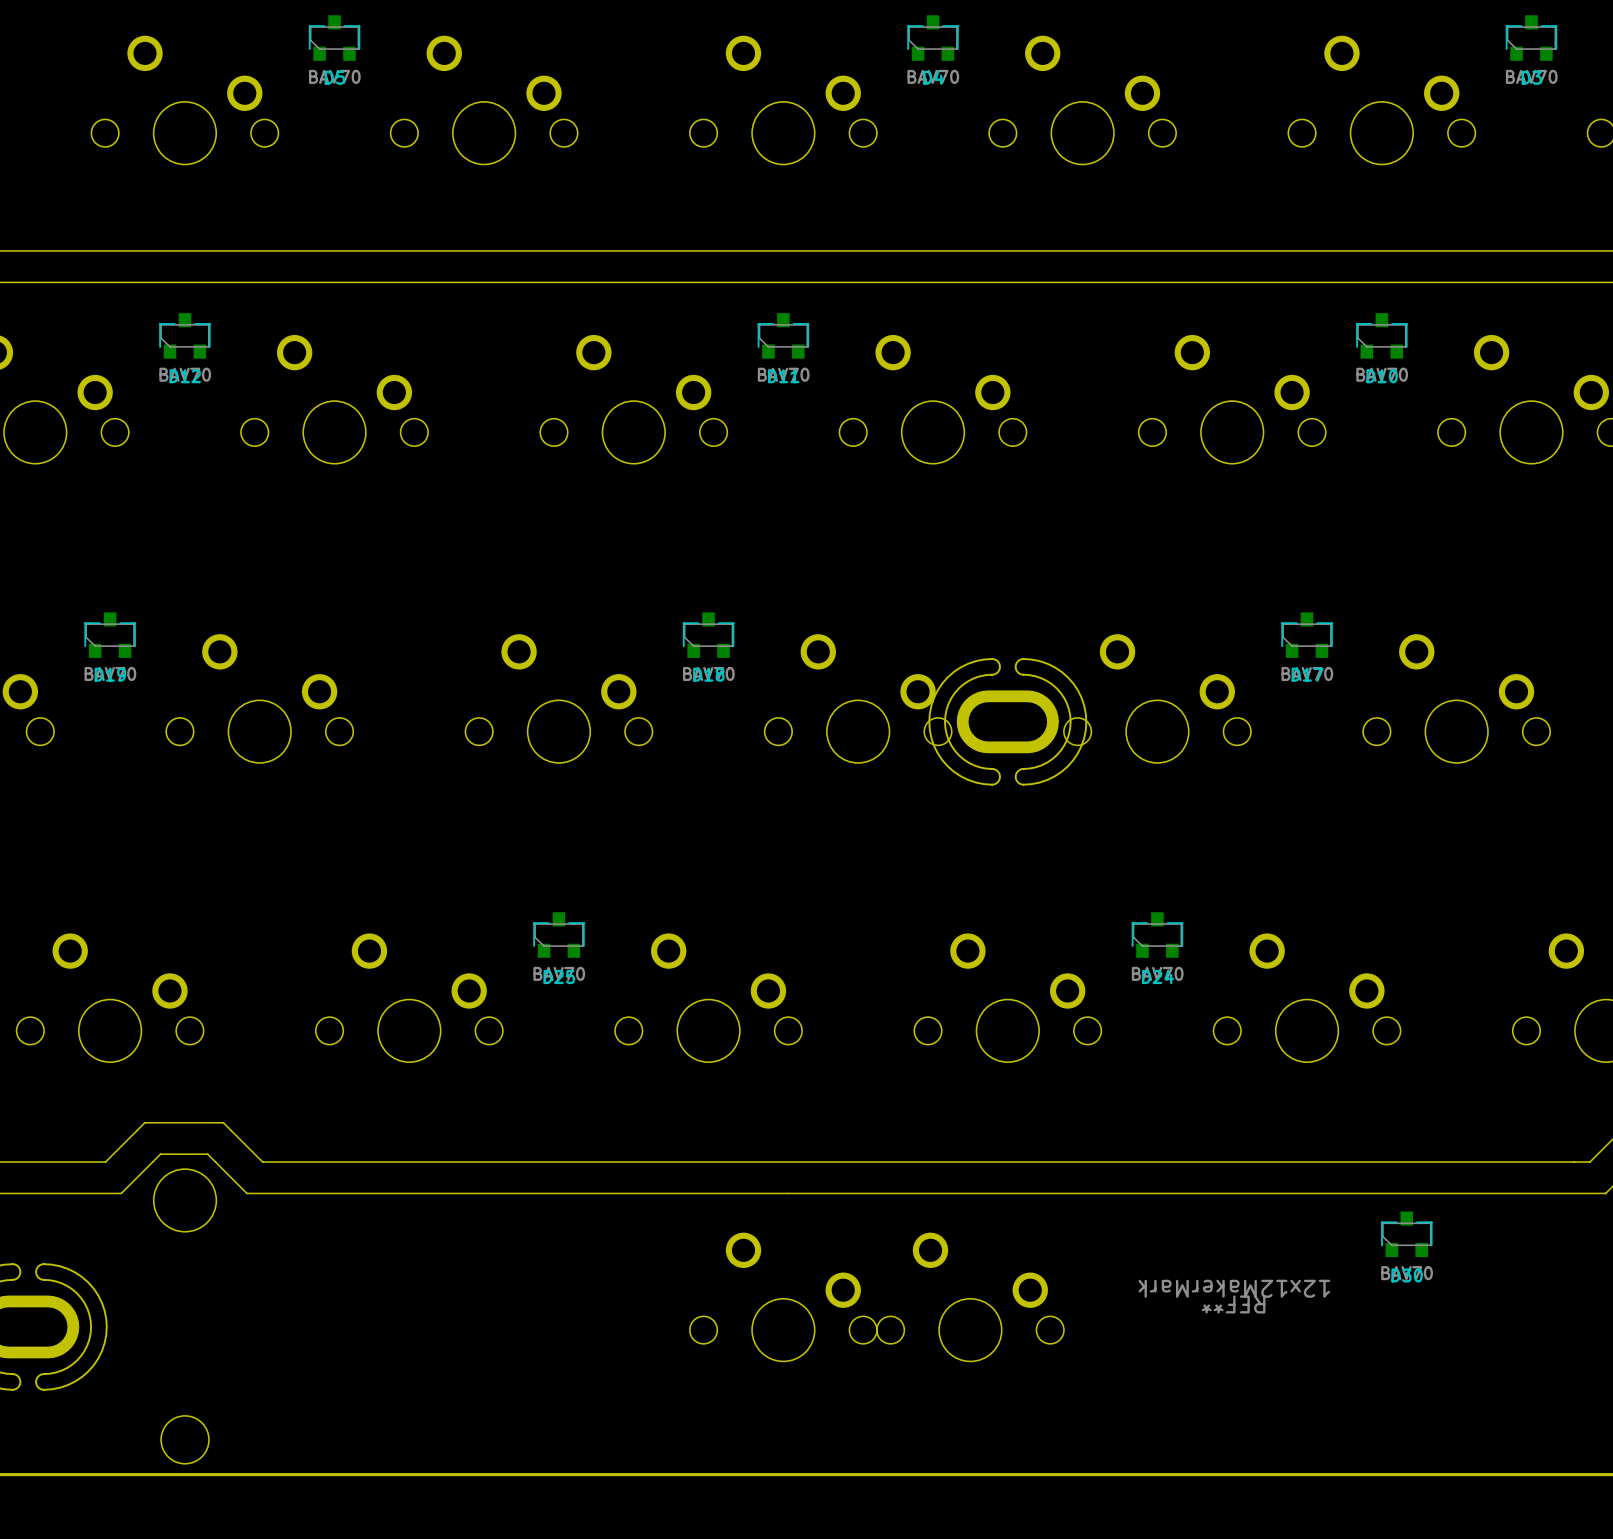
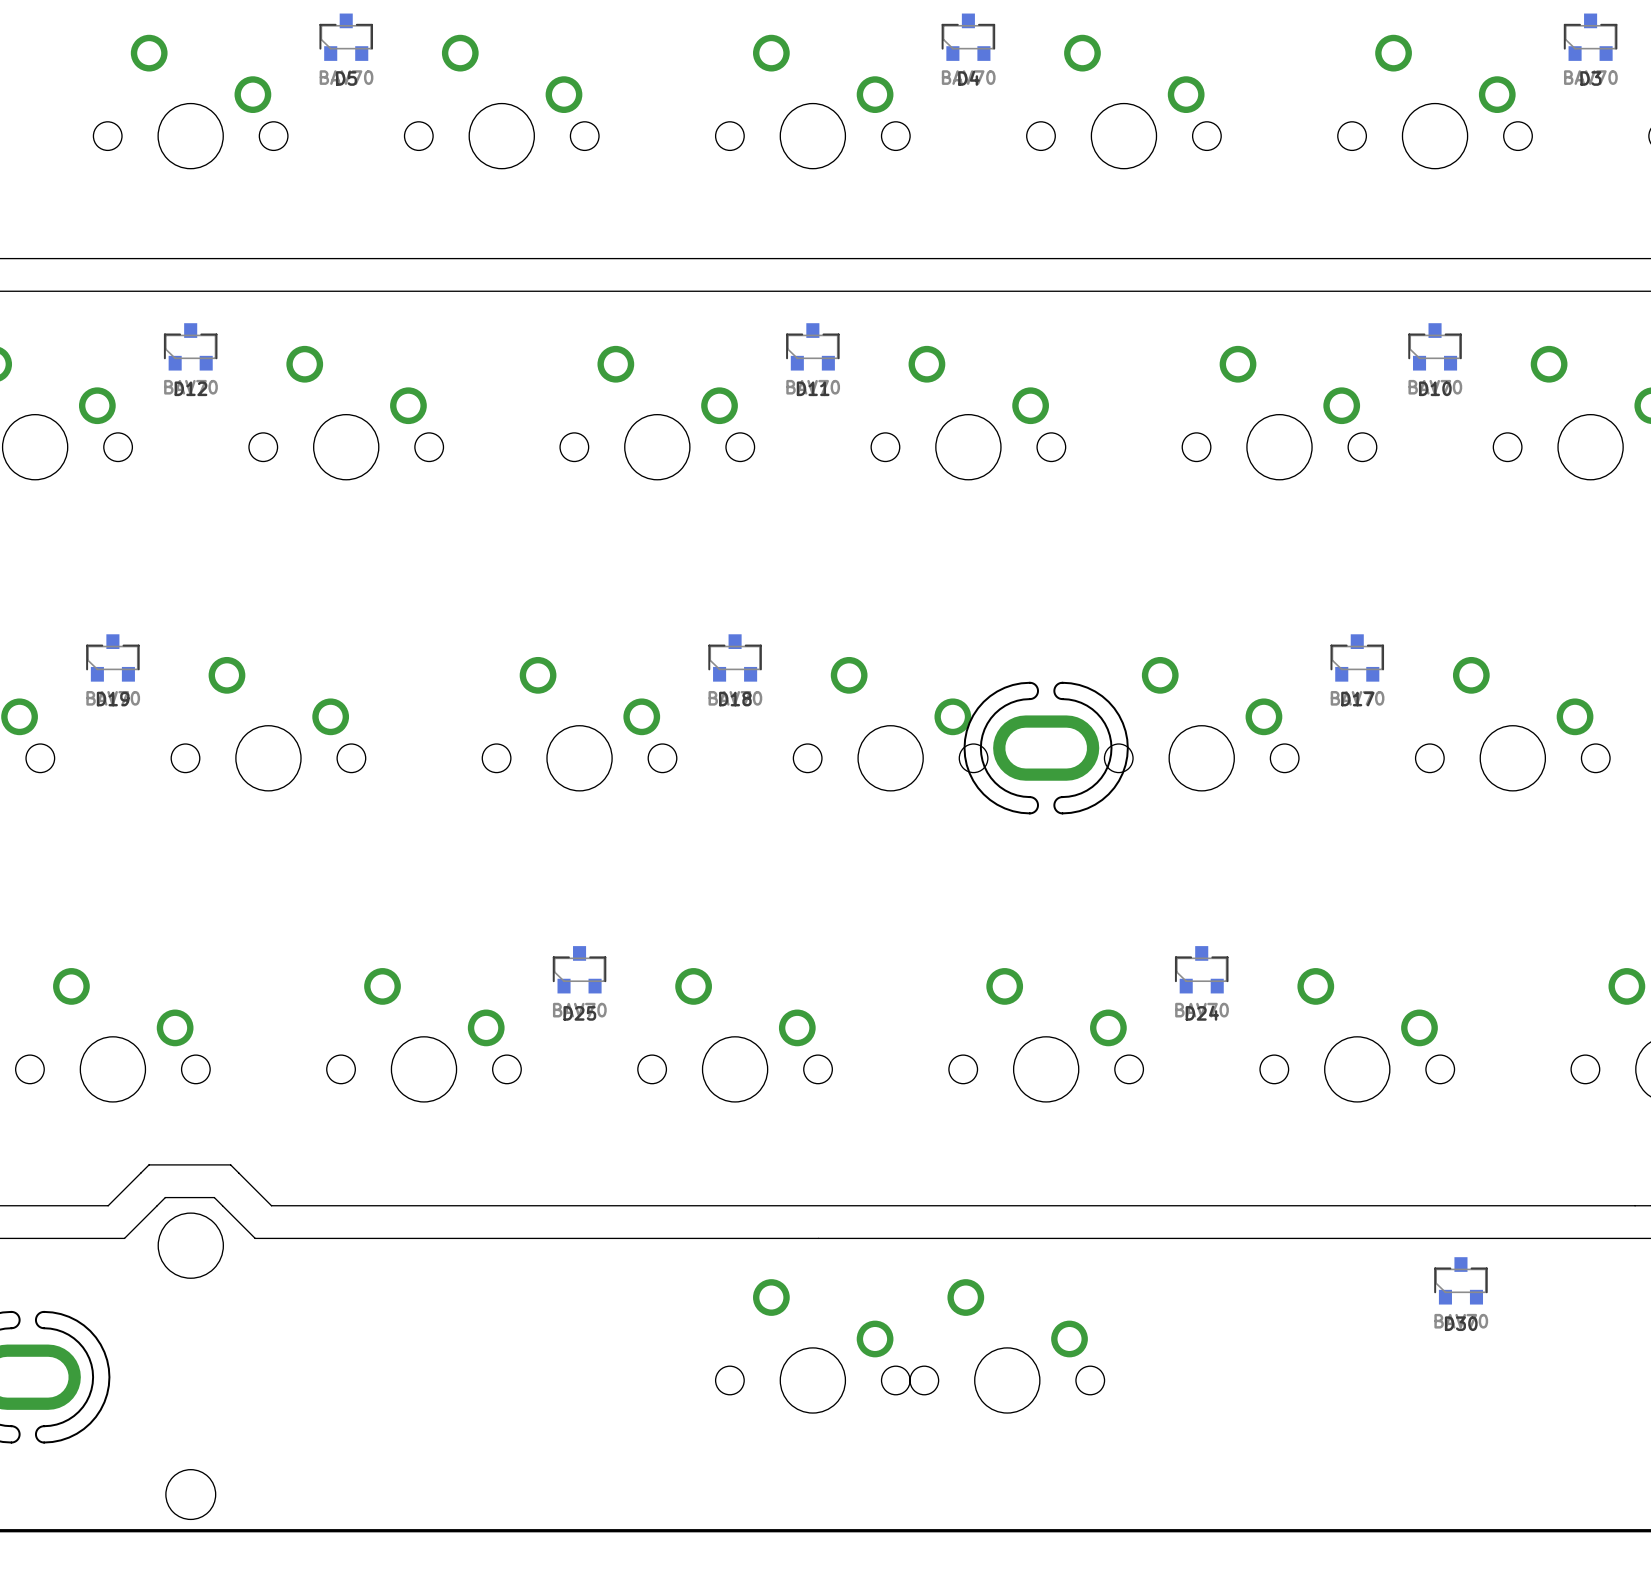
REF**: 12x12MakerMark (1234, 1296) -> none

